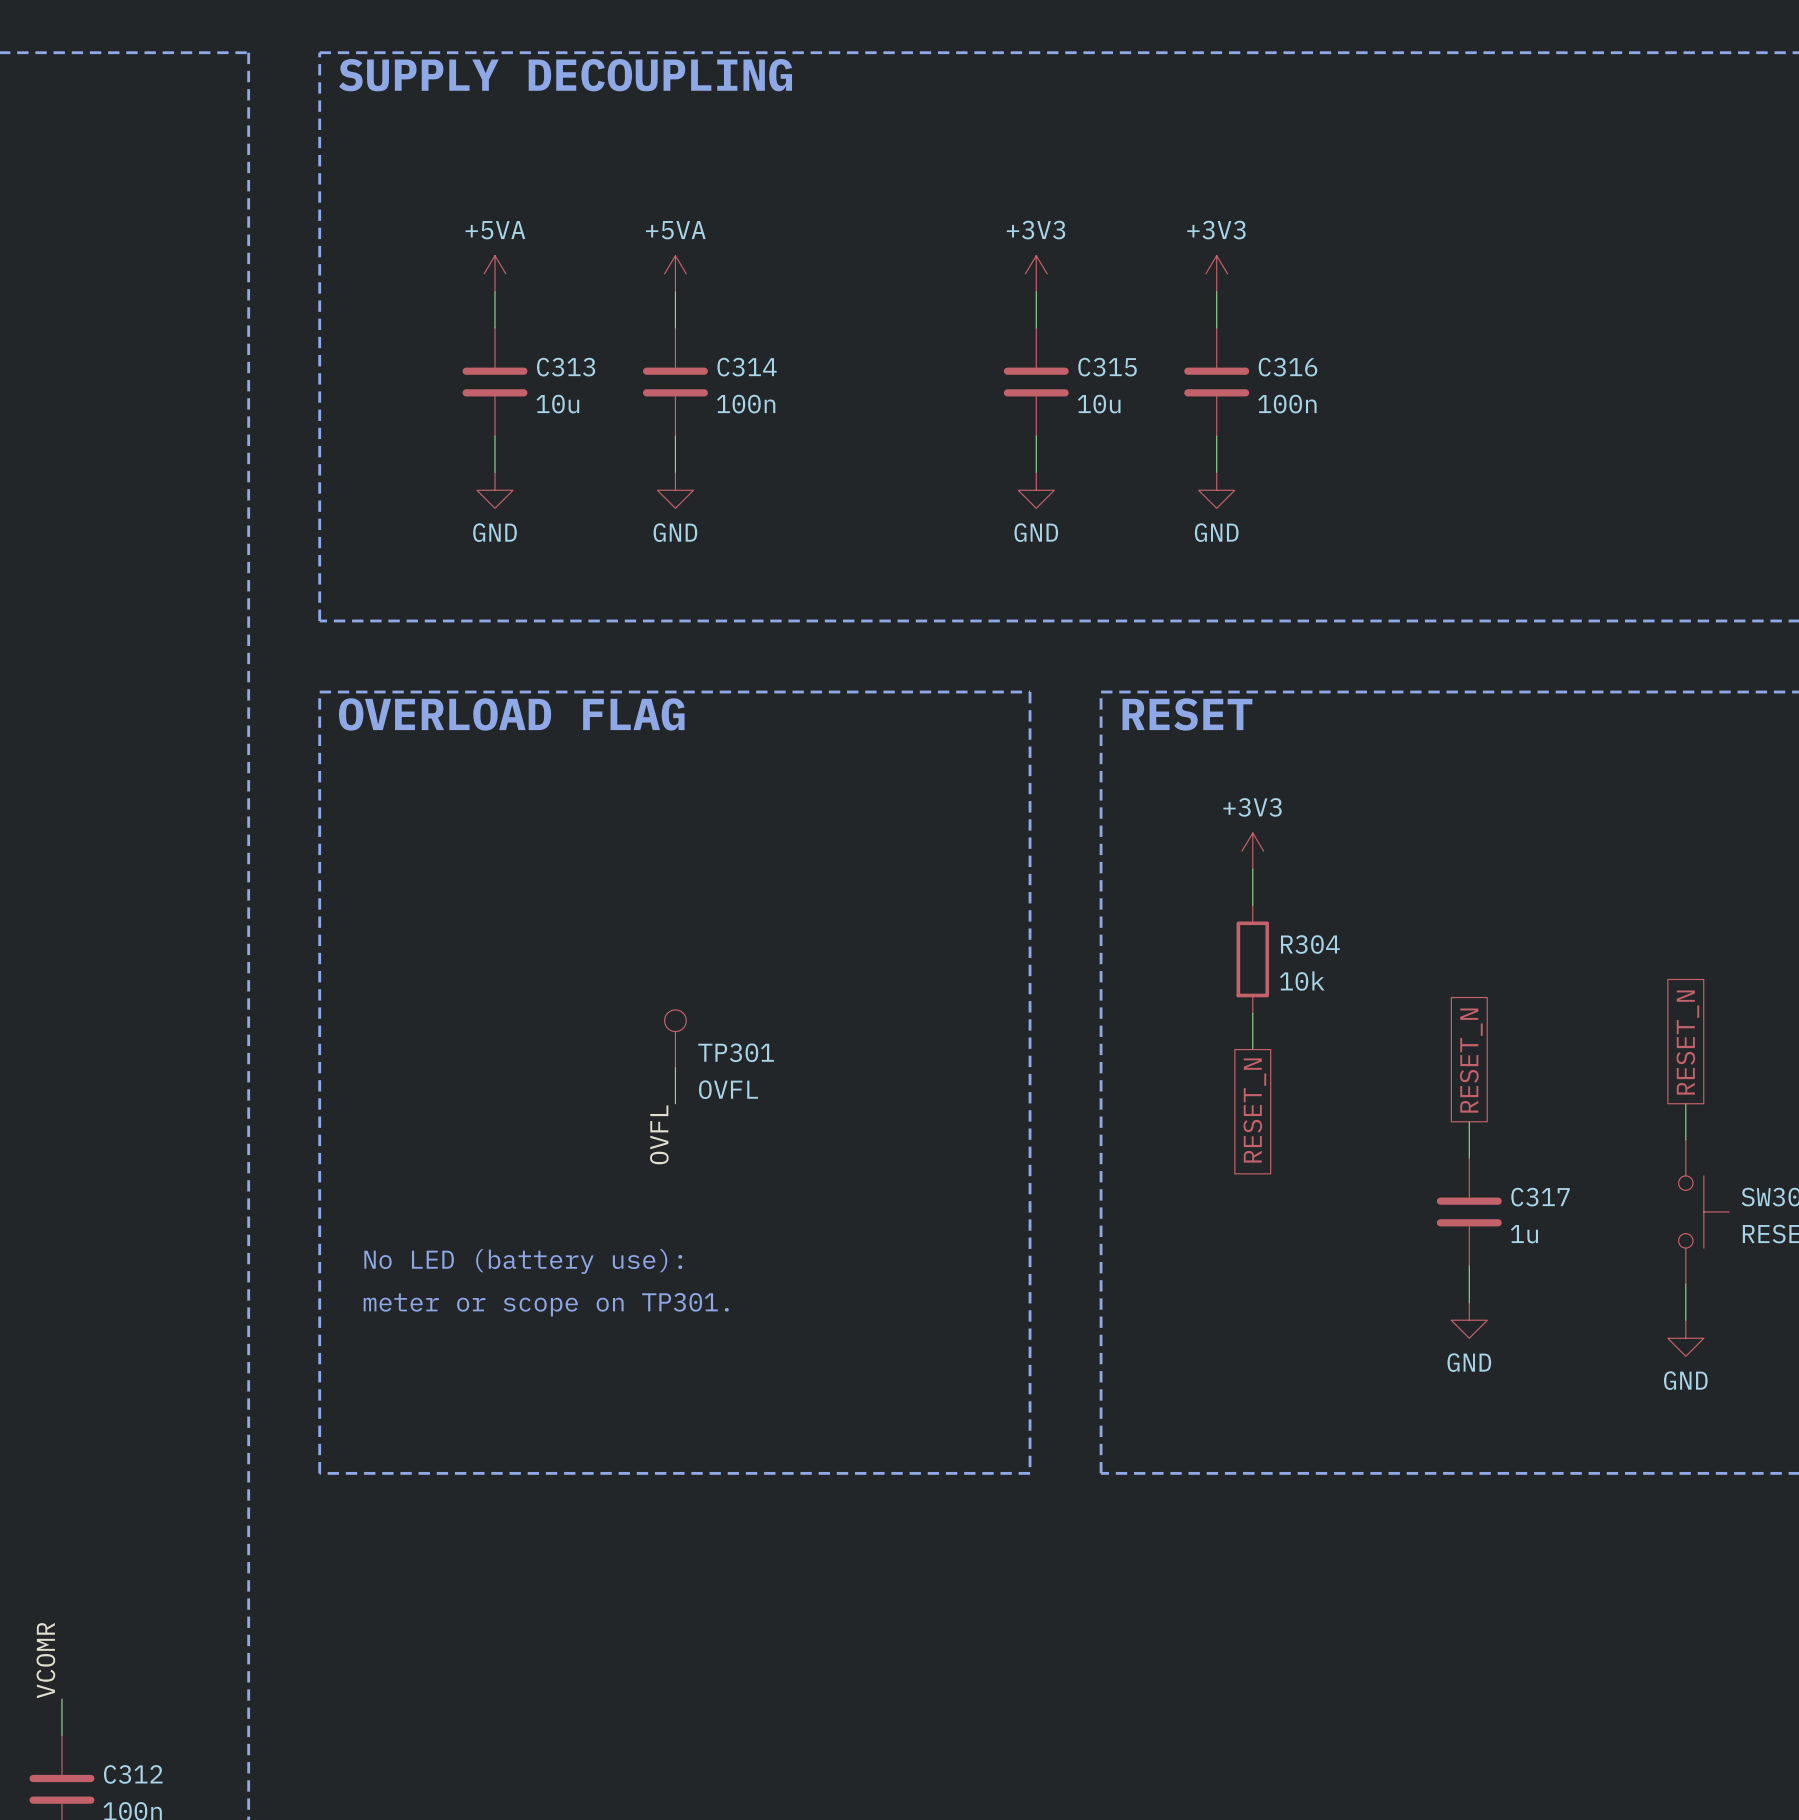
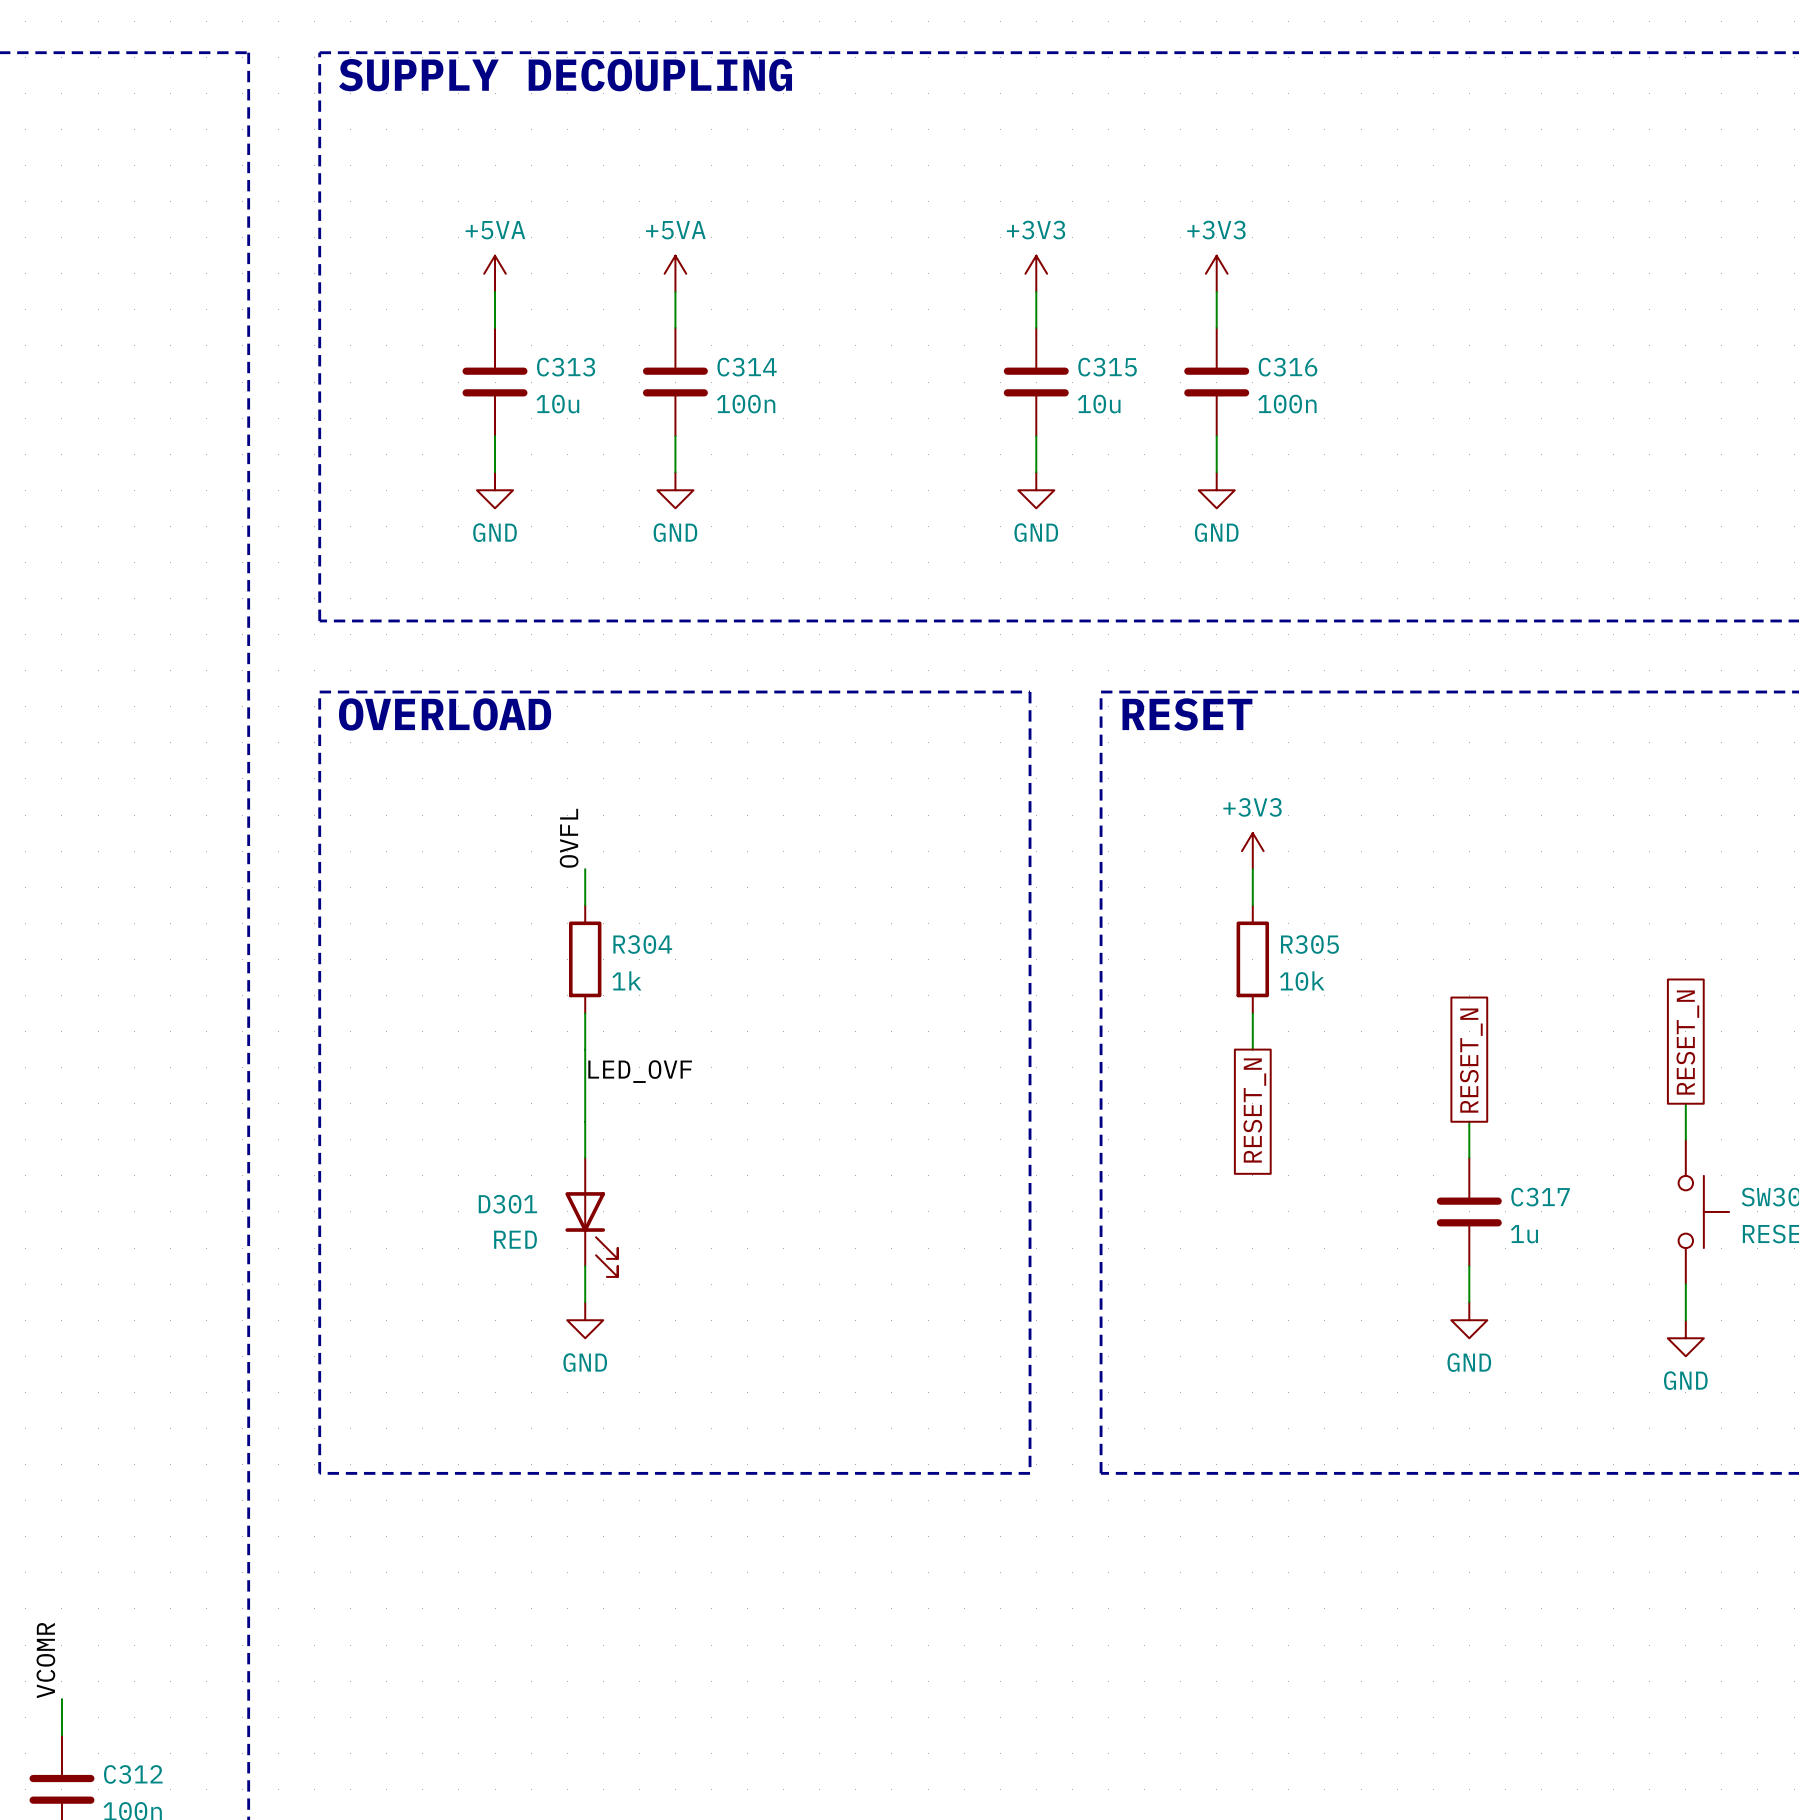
text: OVERLOAD FLAG (511, 714) -> OVERLOAD (445, 714)
R304 name: R304 (1310, 944) -> R305 (1309, 944)
R304: none -> 1k (585, 959)
wire: none -> (585, 1013) (585, 1157)
TP301: OVFL (675, 1038) -> none
wire: (675, 1067) (675, 1103) -> (585, 869) (585, 905)
label: none -> LED_OVF (640, 1071)
label position: OVFL (659, 1134) -> OVFL (569, 838)
D301: none -> RED (591, 1217)
text: No LED (battery use): (523, 1261) -> none
wire: none -> (585, 1266) (585, 1302)
text: meter or scope on TP301. (546, 1304) -> none
power symbol: none -> GND (585, 1320)

